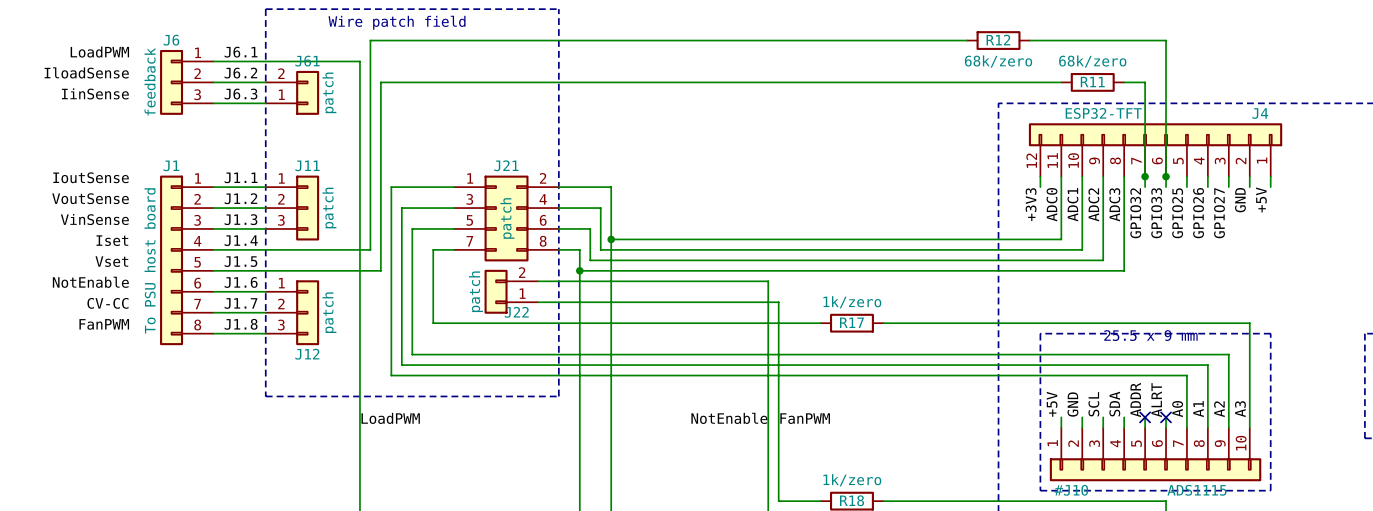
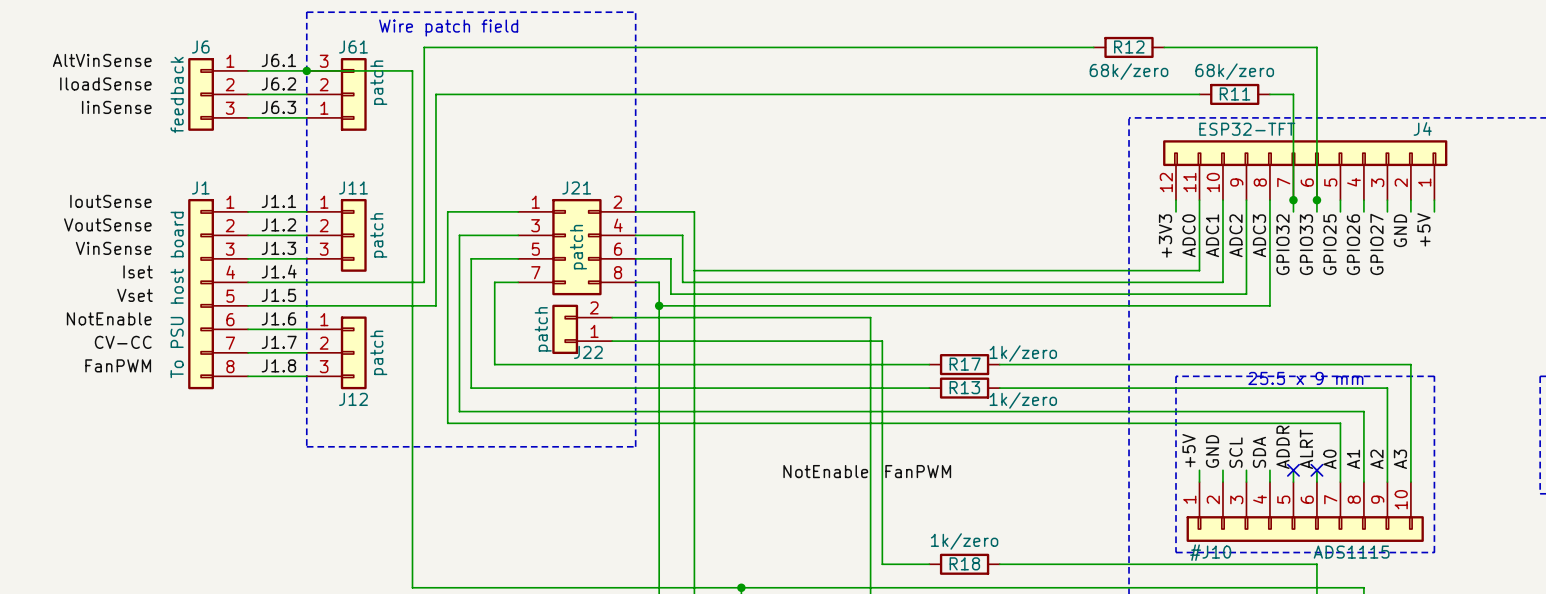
label: LoadPWM (99, 52) -> AltVinSense (102, 60)
junction: none -> (306, 70)
J61 symbol: [265, 70, 320, 115] -> [306, 58, 367, 131]
junction: (611, 239) -> none
R17 value position: 1k/zero (852, 302) -> 1k/zero (1023, 353)
wire: (412, 344) (412, 354) (1228, 354) -> (471, 388) (929, 388)
R13: none -> 1k/zero (964, 388)
wire: none -> (999, 388) (1387, 388) (1387, 399)
label: LoadPWM (390, 418) -> none

